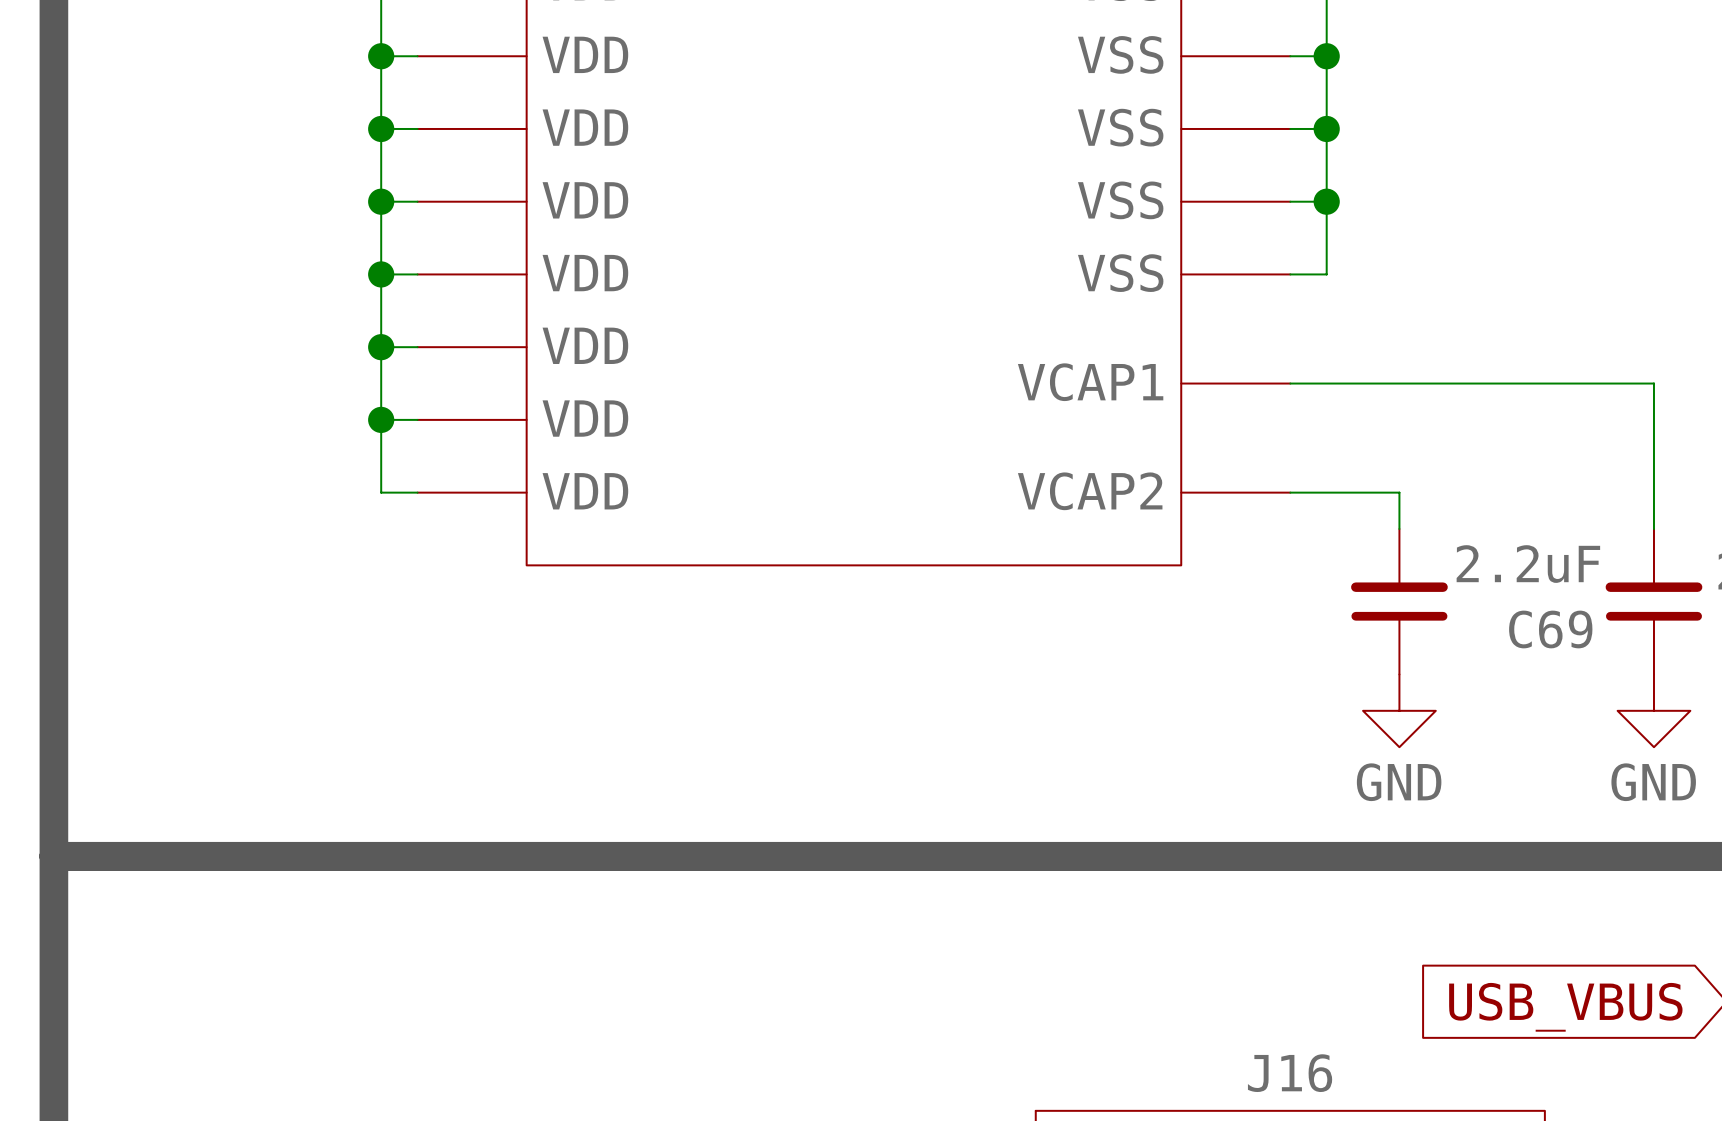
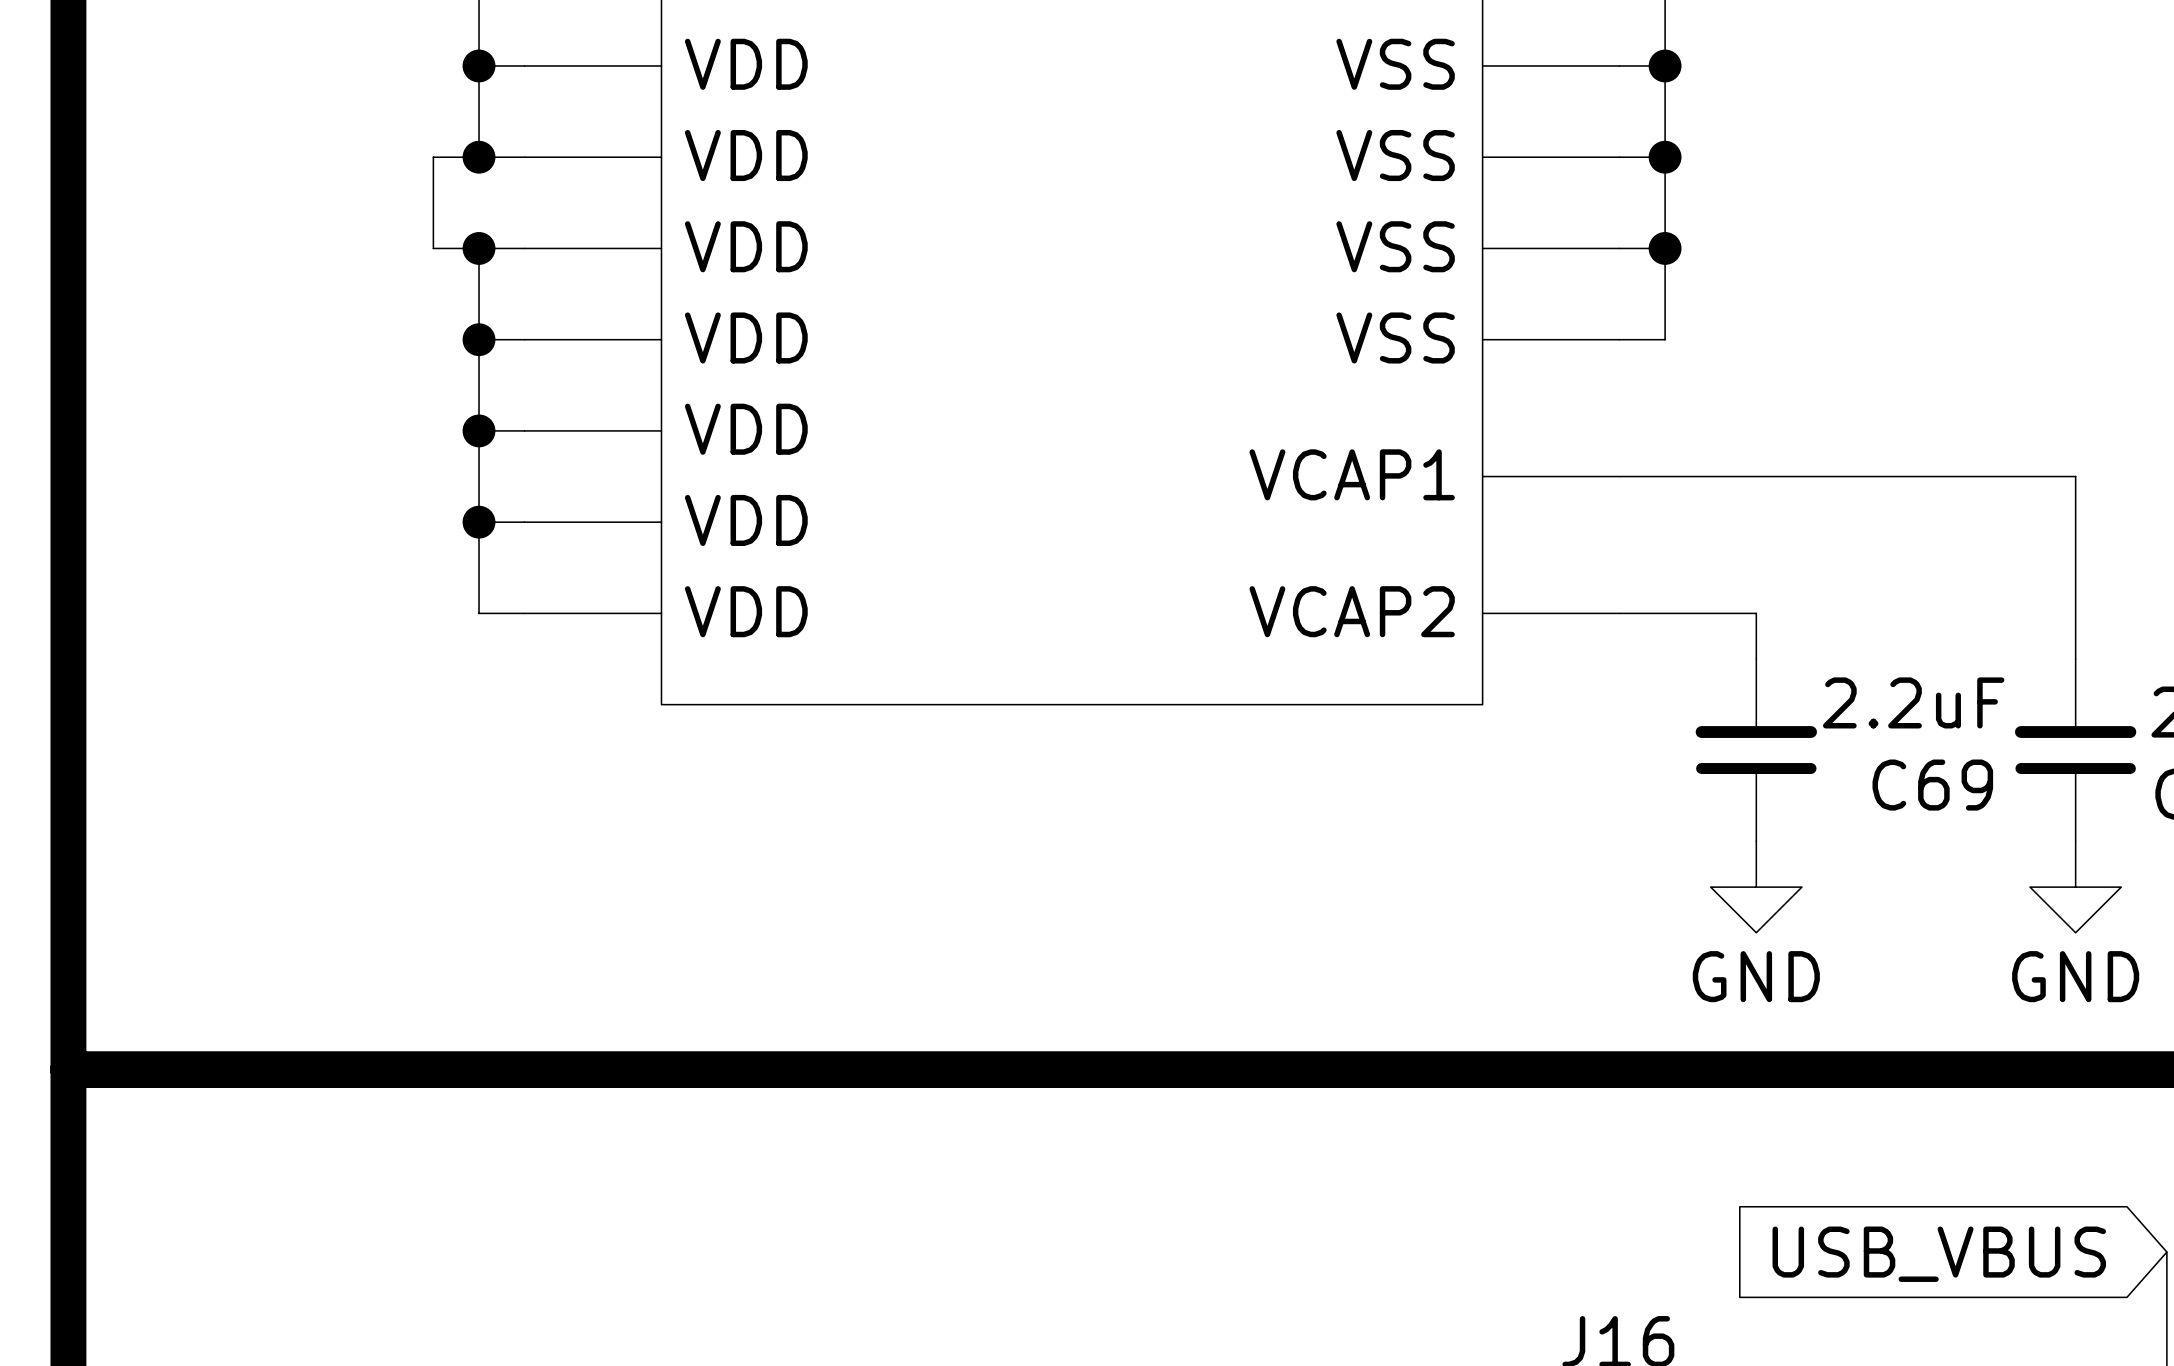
wire: (381, 128) (381, 201) -> (479, 157) (433, 157) (433, 248) (479, 248)

